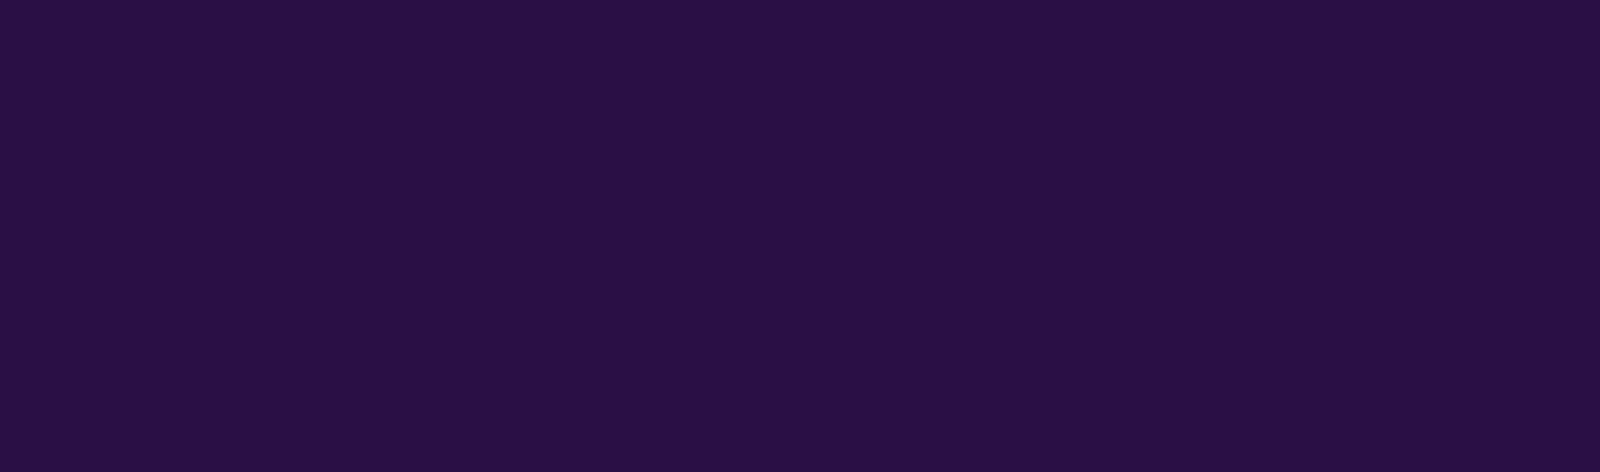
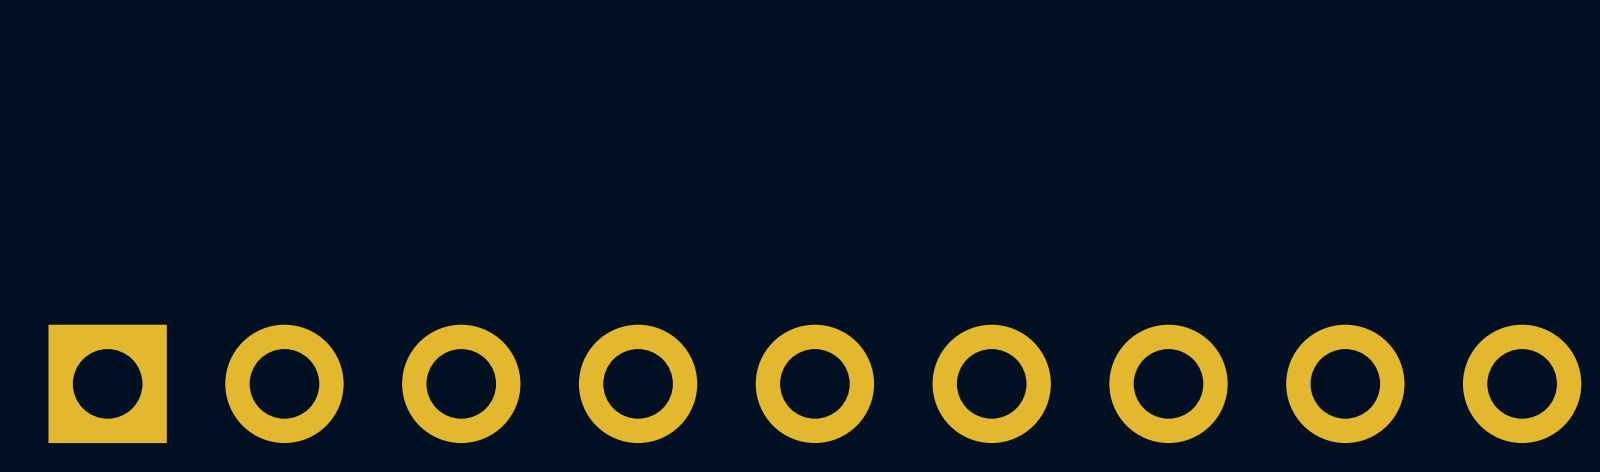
part: none -> (814, 383)

